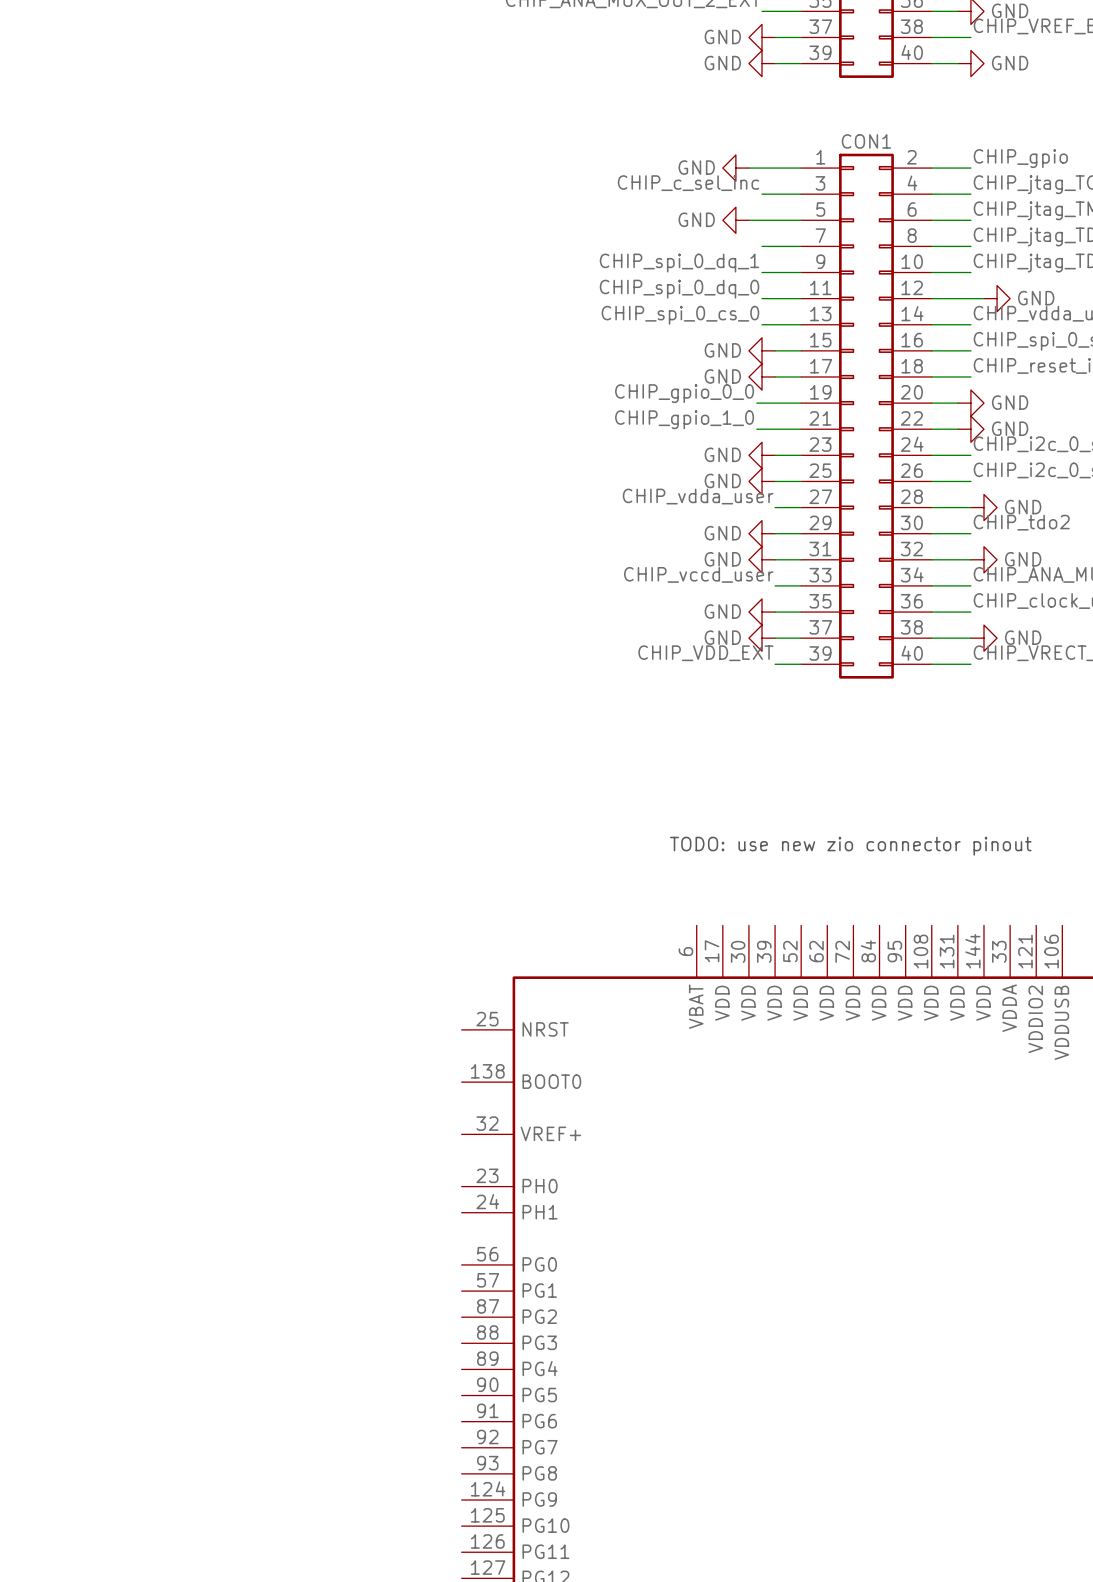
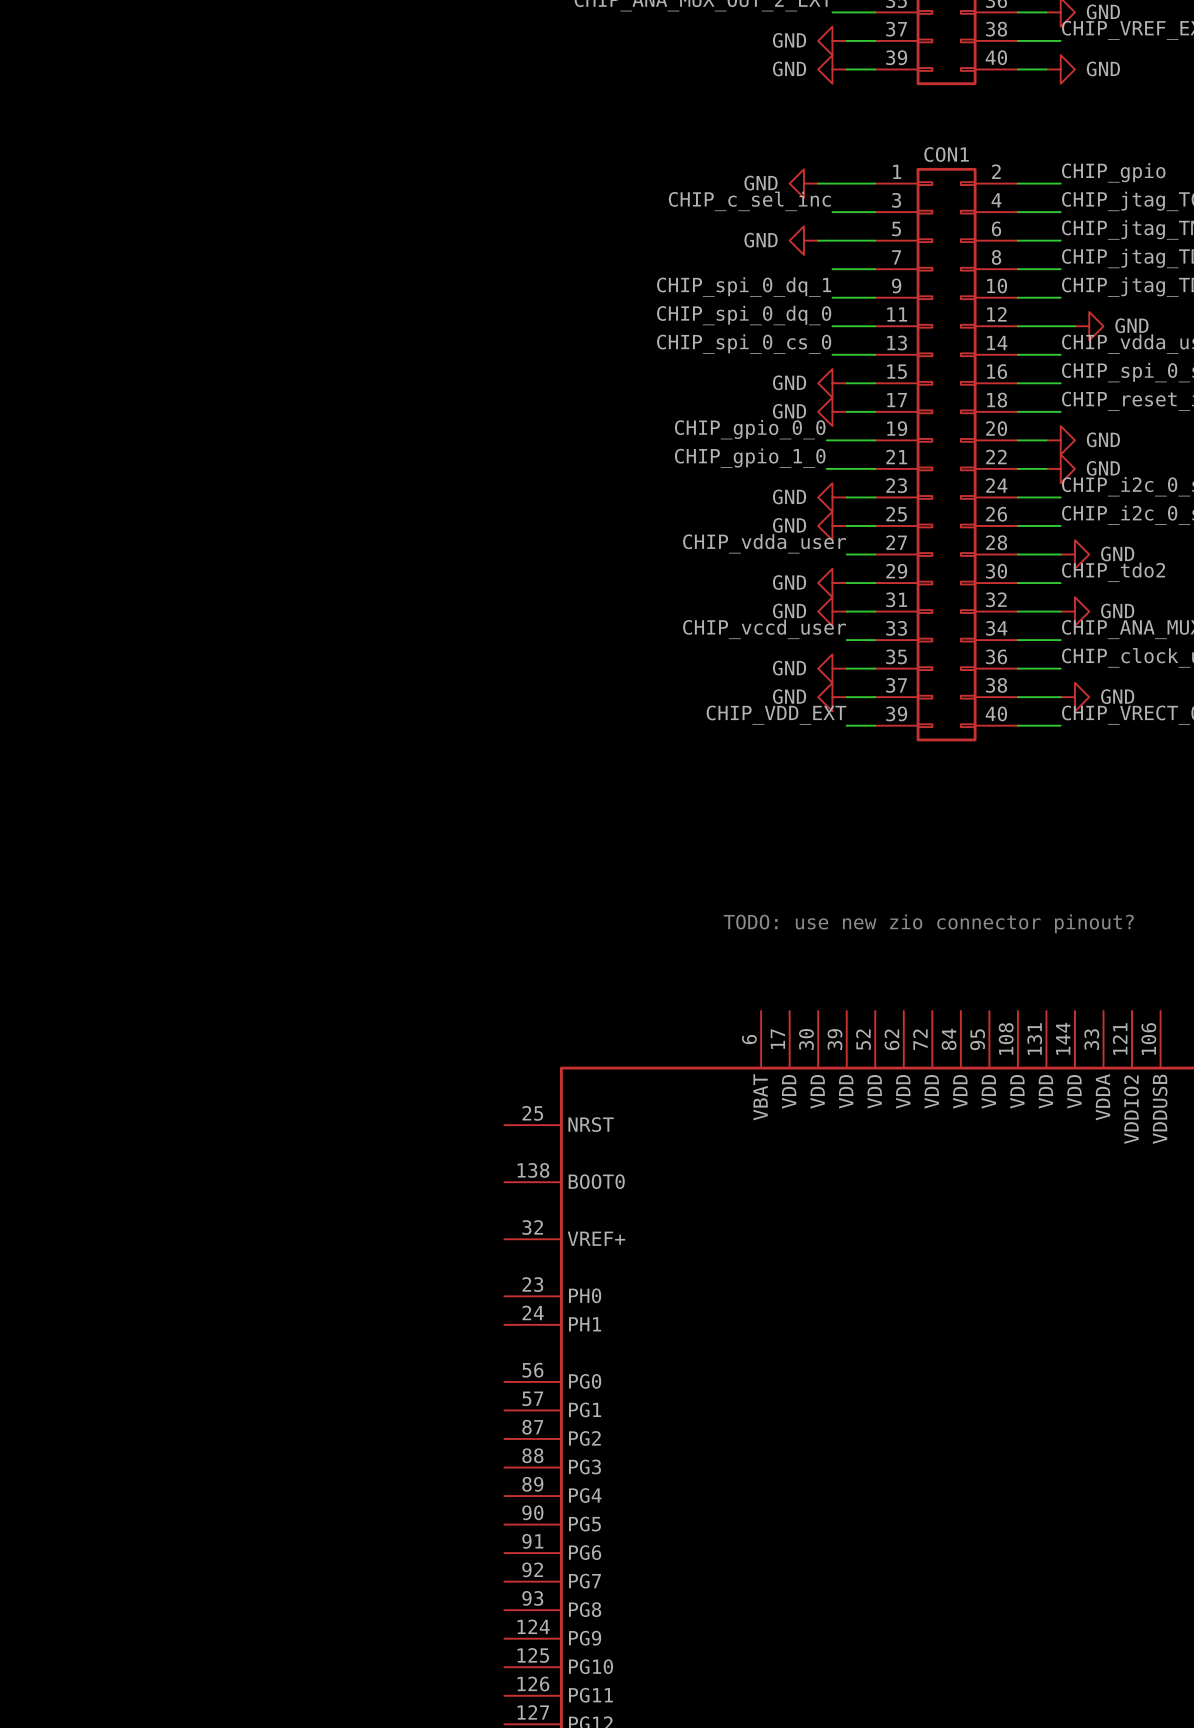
text: TODO: use new zio connector pinout (850, 846) -> TODO: use new zio connector pinout? (928, 923)

